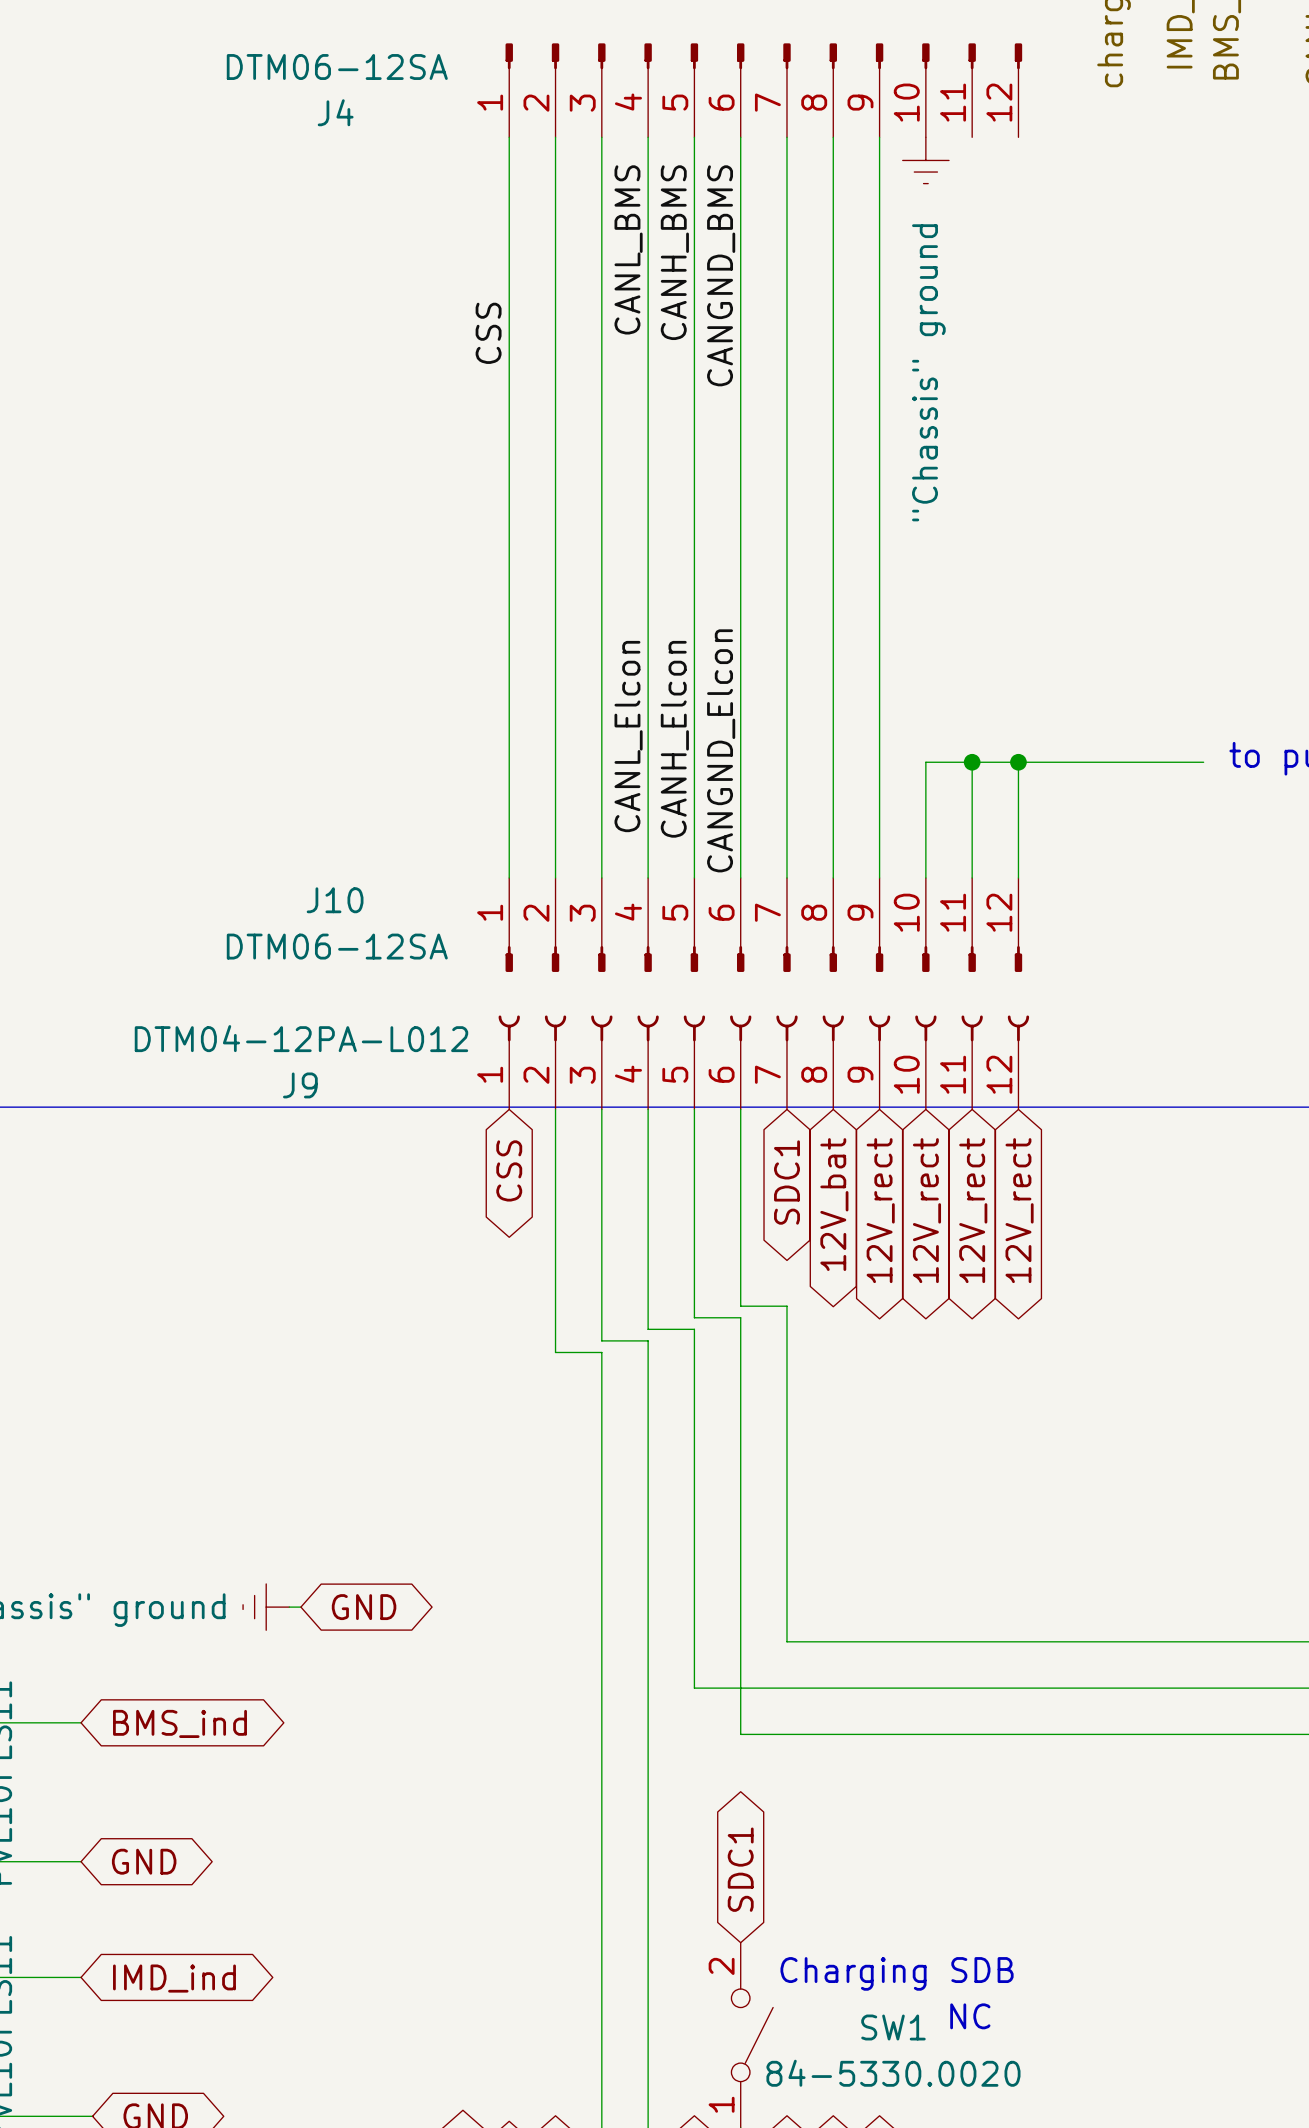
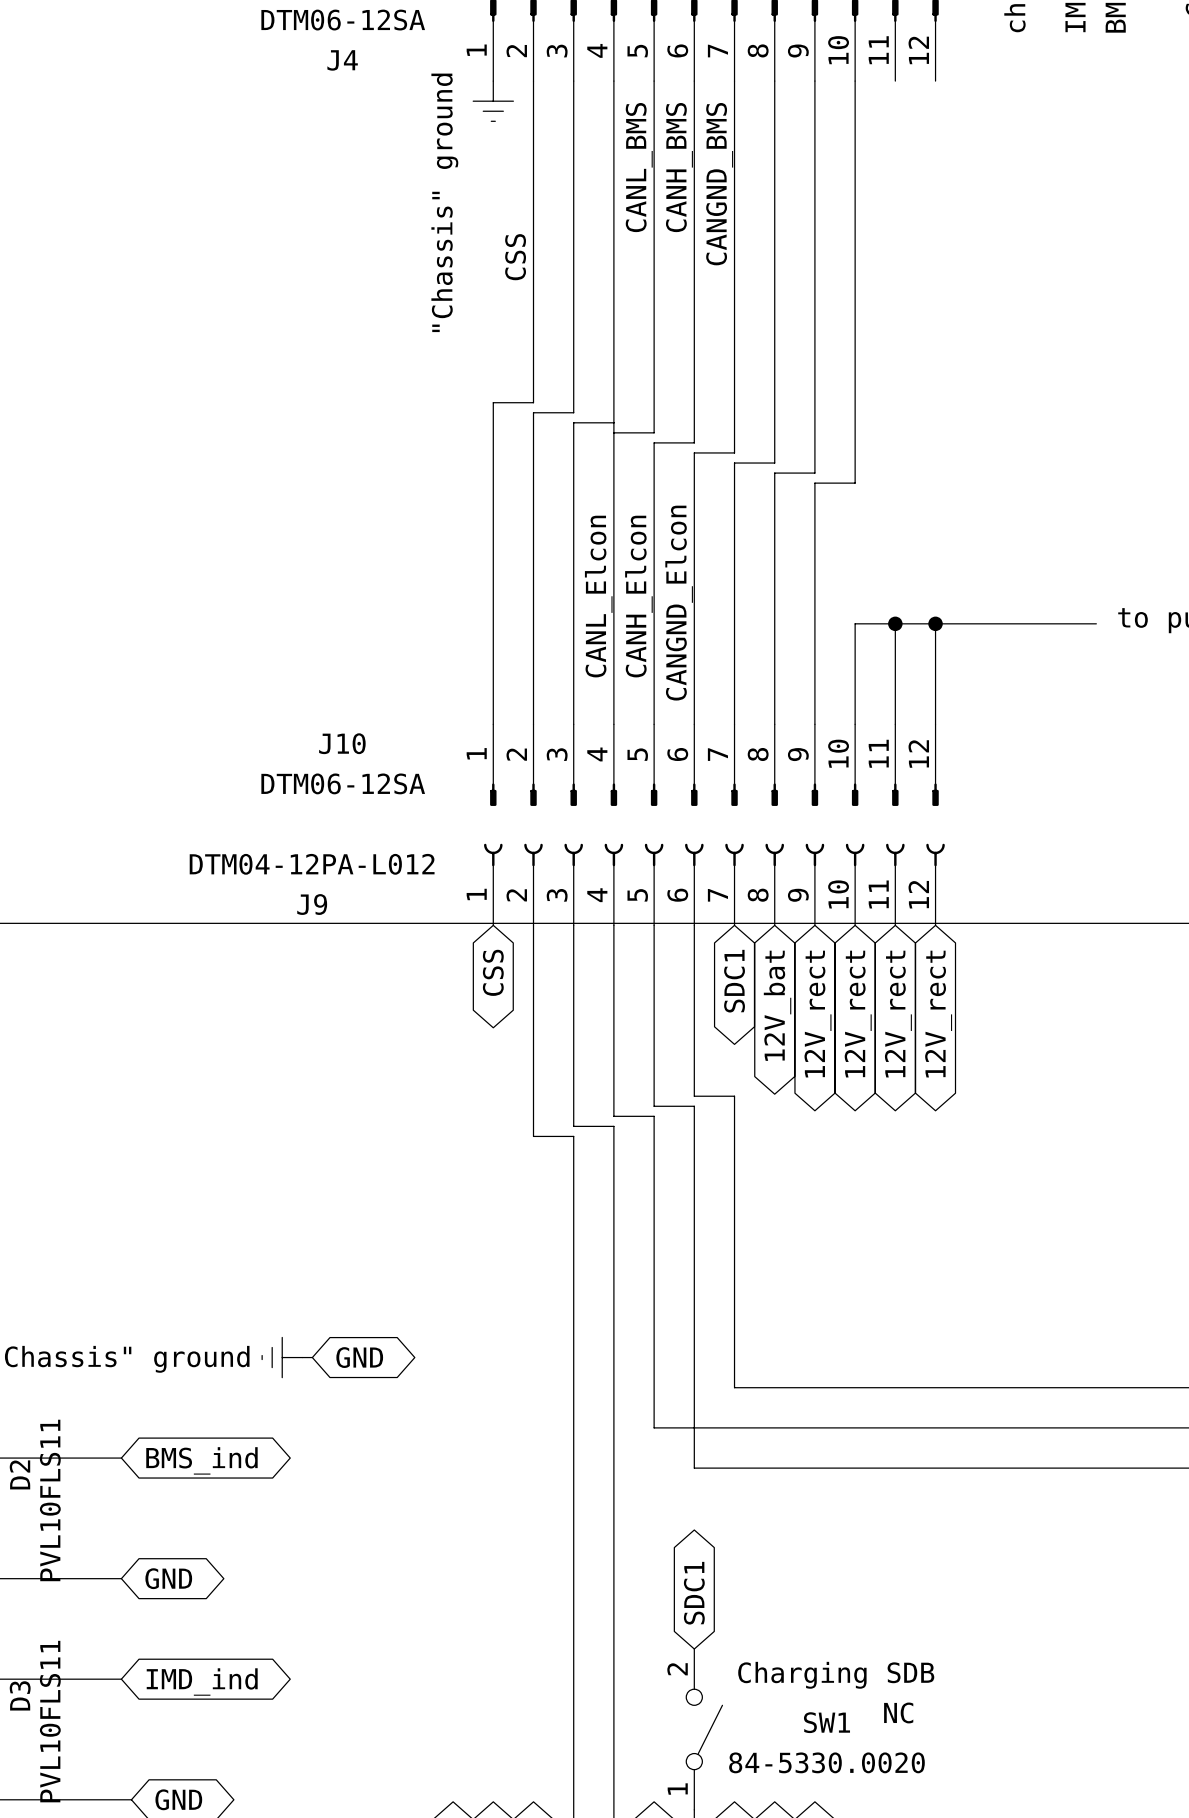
wire: (509, 137) (509, 507) -> none
power symbol position: "Chassis" ground (925, 160) -> "Chassis" ground (493, 101)
label: CANL_BMS (628, 249) -> none
label: CANH_BMS (674, 252) -> CANL_BMS (639, 167)
label: CANGND_BMS (721, 275) -> CANH_BMS (679, 167)
label: none -> CANGND_BMS (719, 184)
label position: CSS (488, 333) -> CSS (515, 257)
power symbol text position: "Chassis" ground (928, 372) -> "Chassis" ground (444, 202)
wire: (555, 507) (555, 519) -> (533, 402) (493, 402)
wire: none -> (533, 412) (573, 412)
wire: (601, 519) (601, 530) -> (613, 422) (573, 422)
wire: (694, 542) (694, 553) -> (654, 432) (613, 432)
wire: none -> (654, 442) (694, 442)
wire: (740, 553) (740, 565) -> (734, 452) (694, 452)
wire: (786, 565) (786, 577) -> (774, 463) (734, 463)
wire: (833, 577) (833, 588) -> (814, 473) (774, 473)
wire: (879, 588) (879, 600) -> (855, 81) (855, 483) (814, 483)

